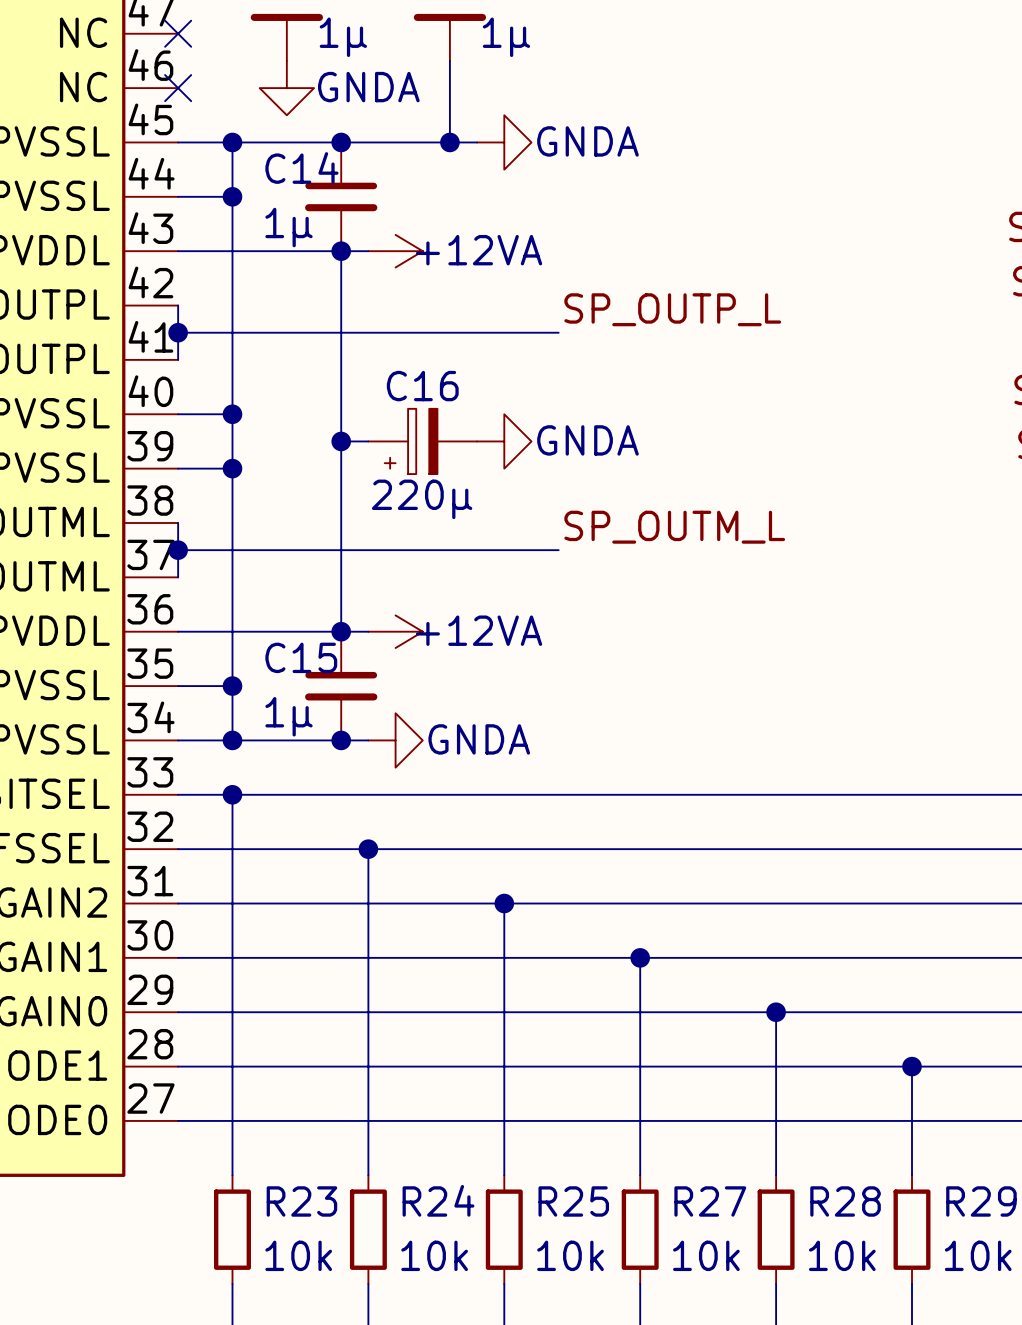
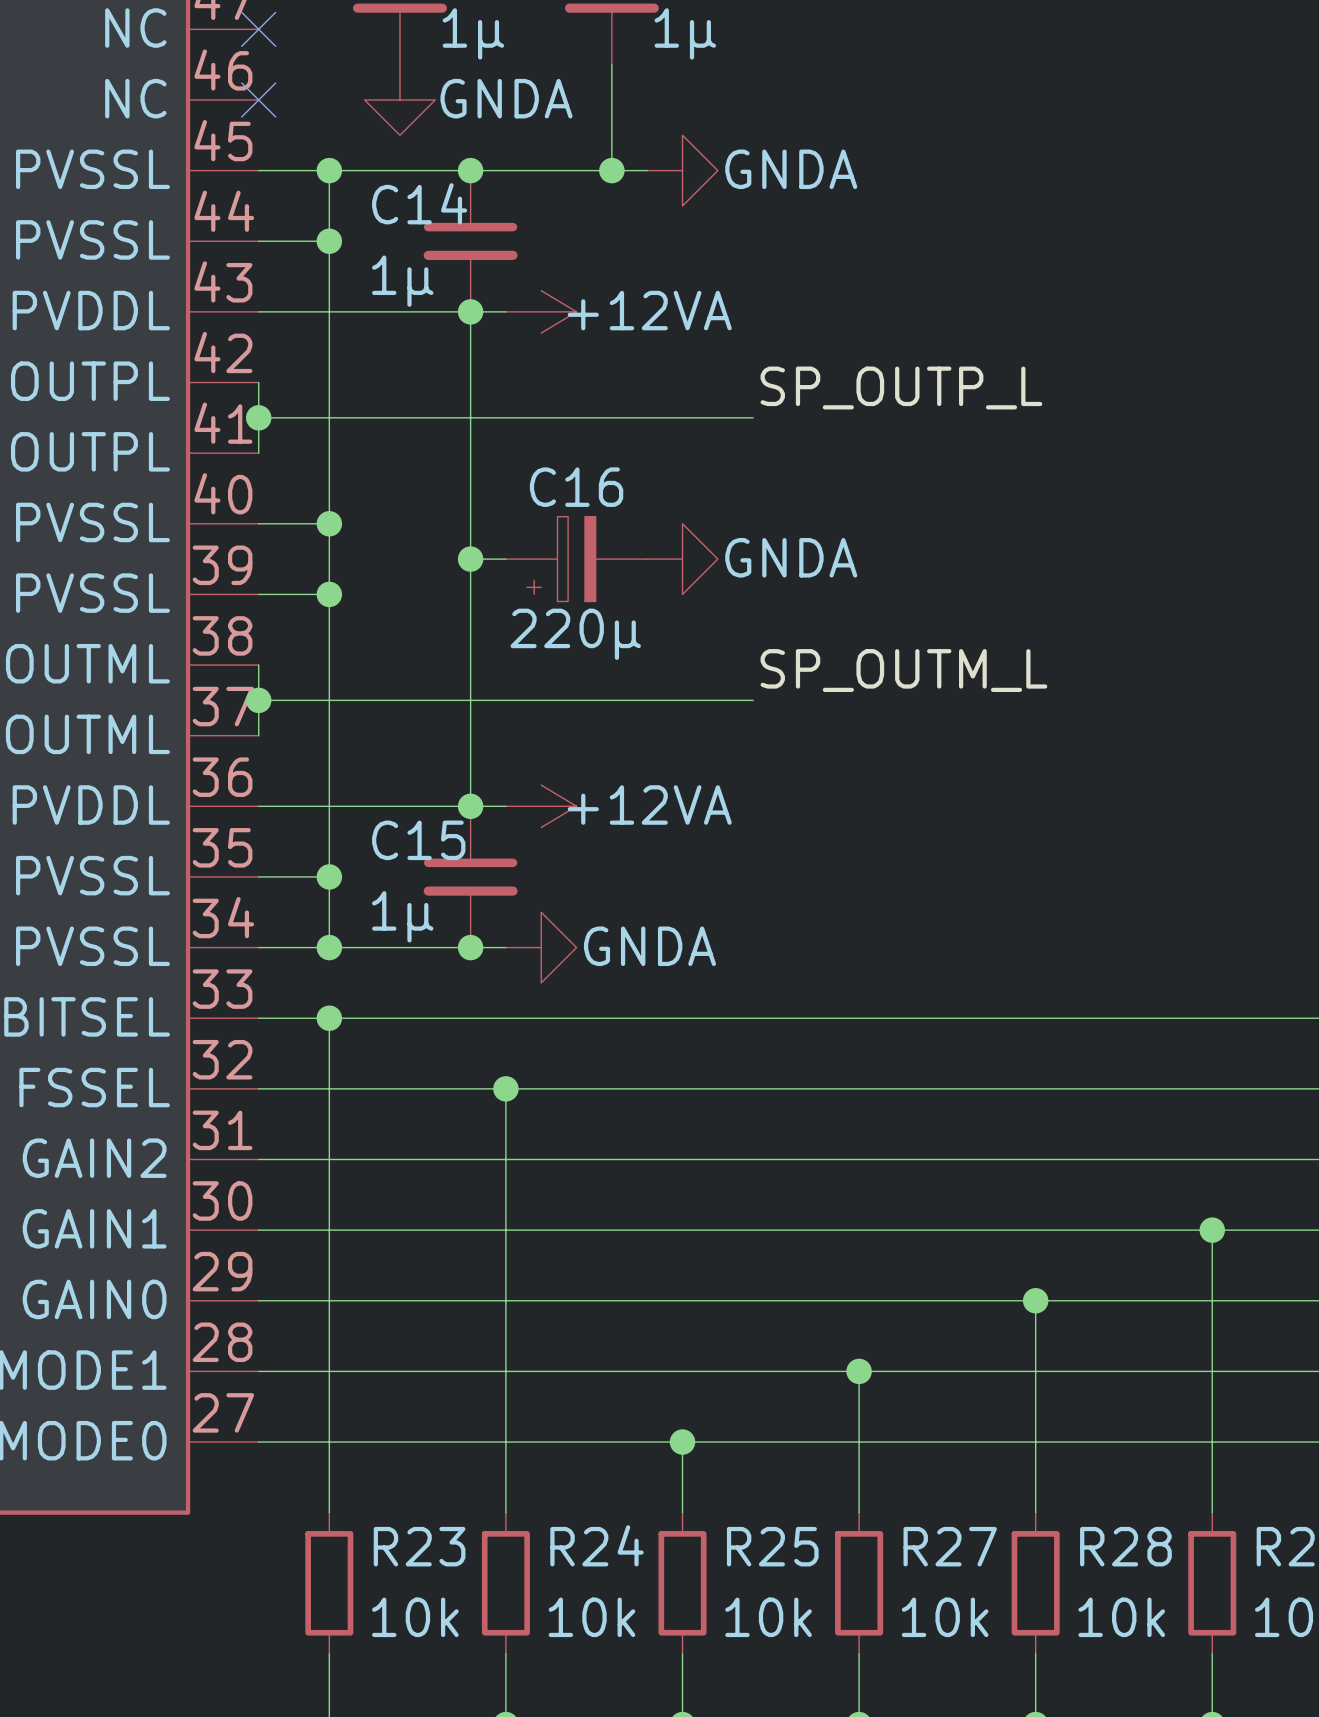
wire: (504, 903) (504, 1120) -> none
junction: (504, 903) -> none
wire: (640, 957) (640, 1066) -> (1212, 1230) (1212, 1371)
junction: (640, 957) -> none
junction: none -> (1212, 1230)
junction: none -> (859, 1371)
junction: (912, 1066) -> none
junction: none -> (682, 1442)

